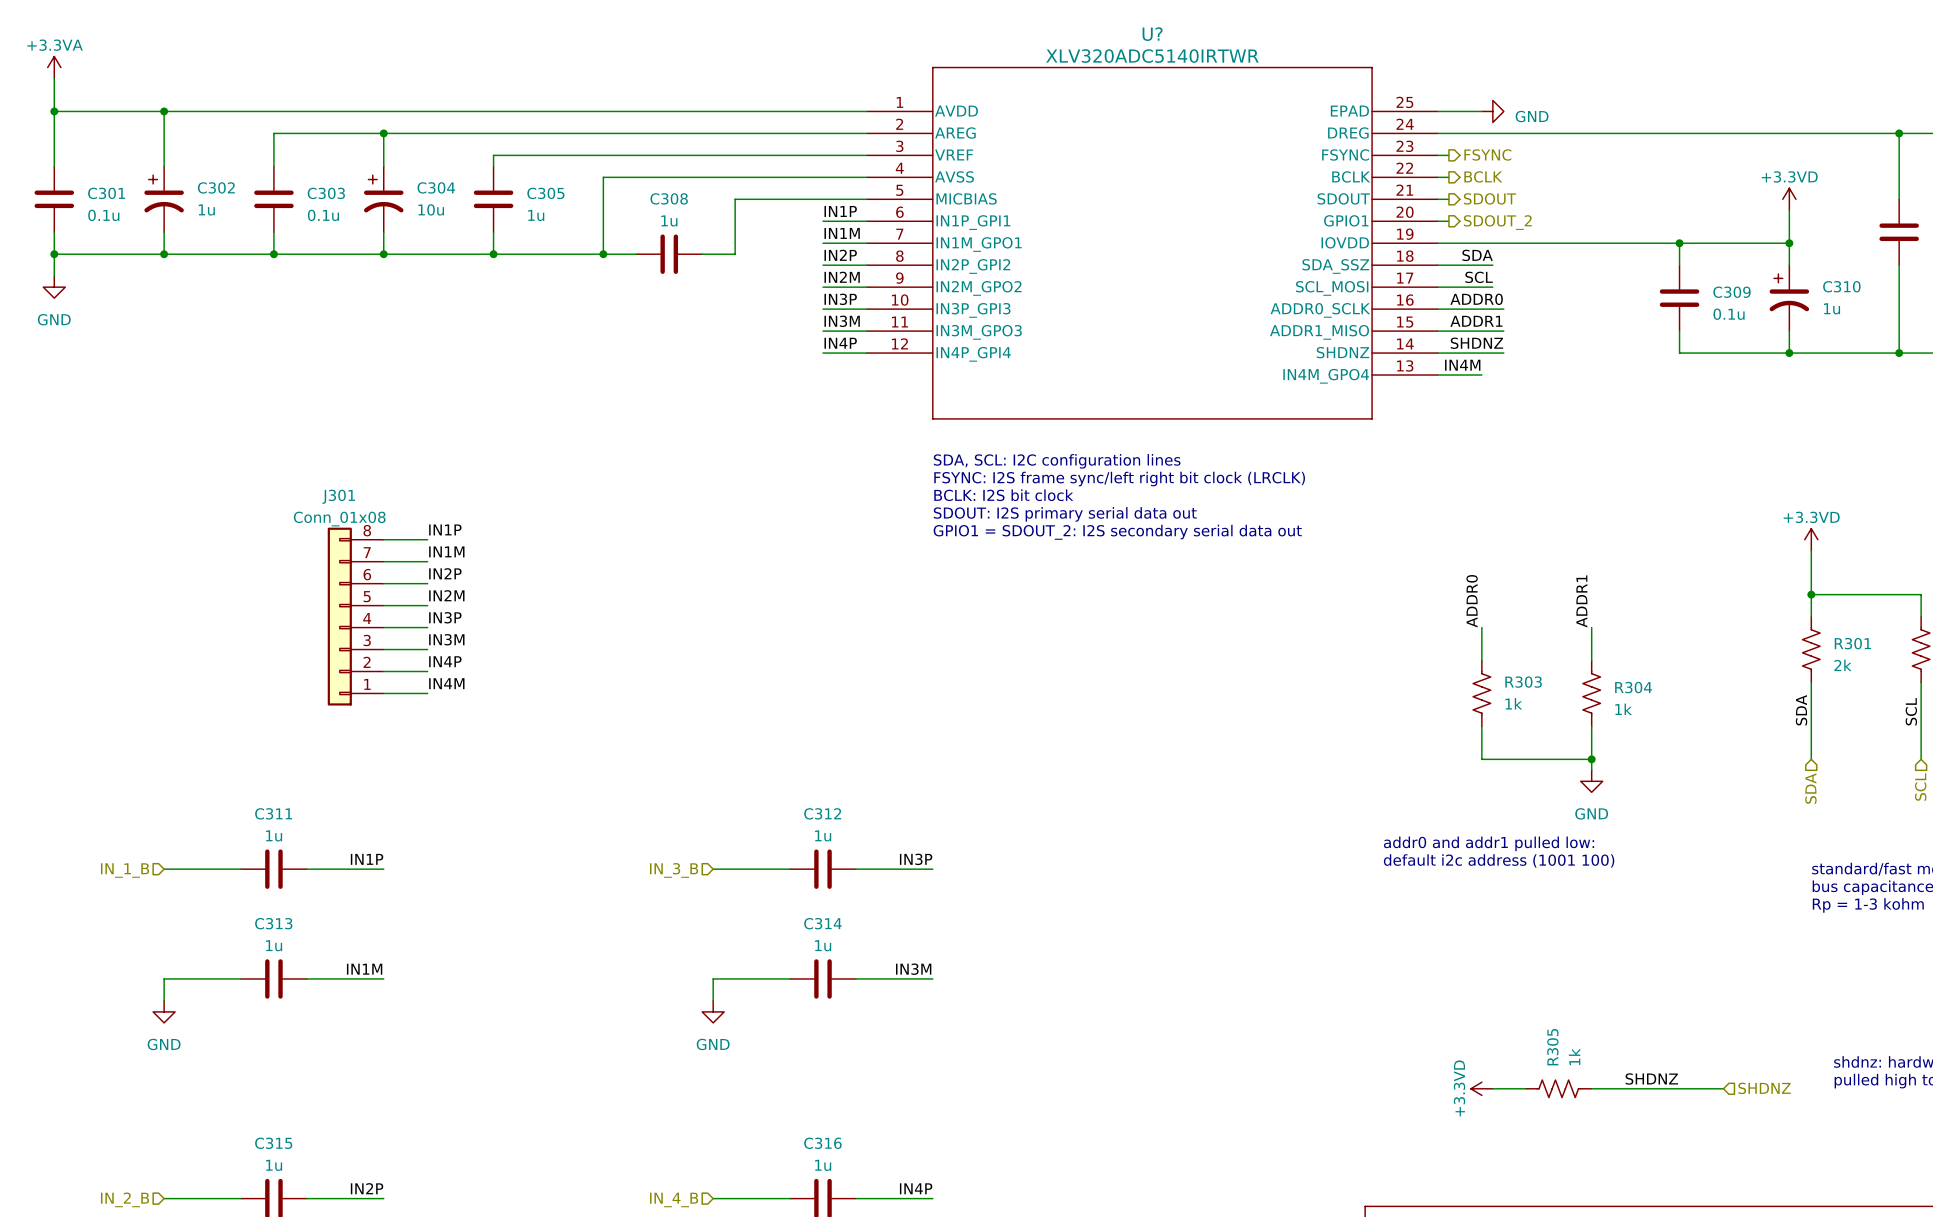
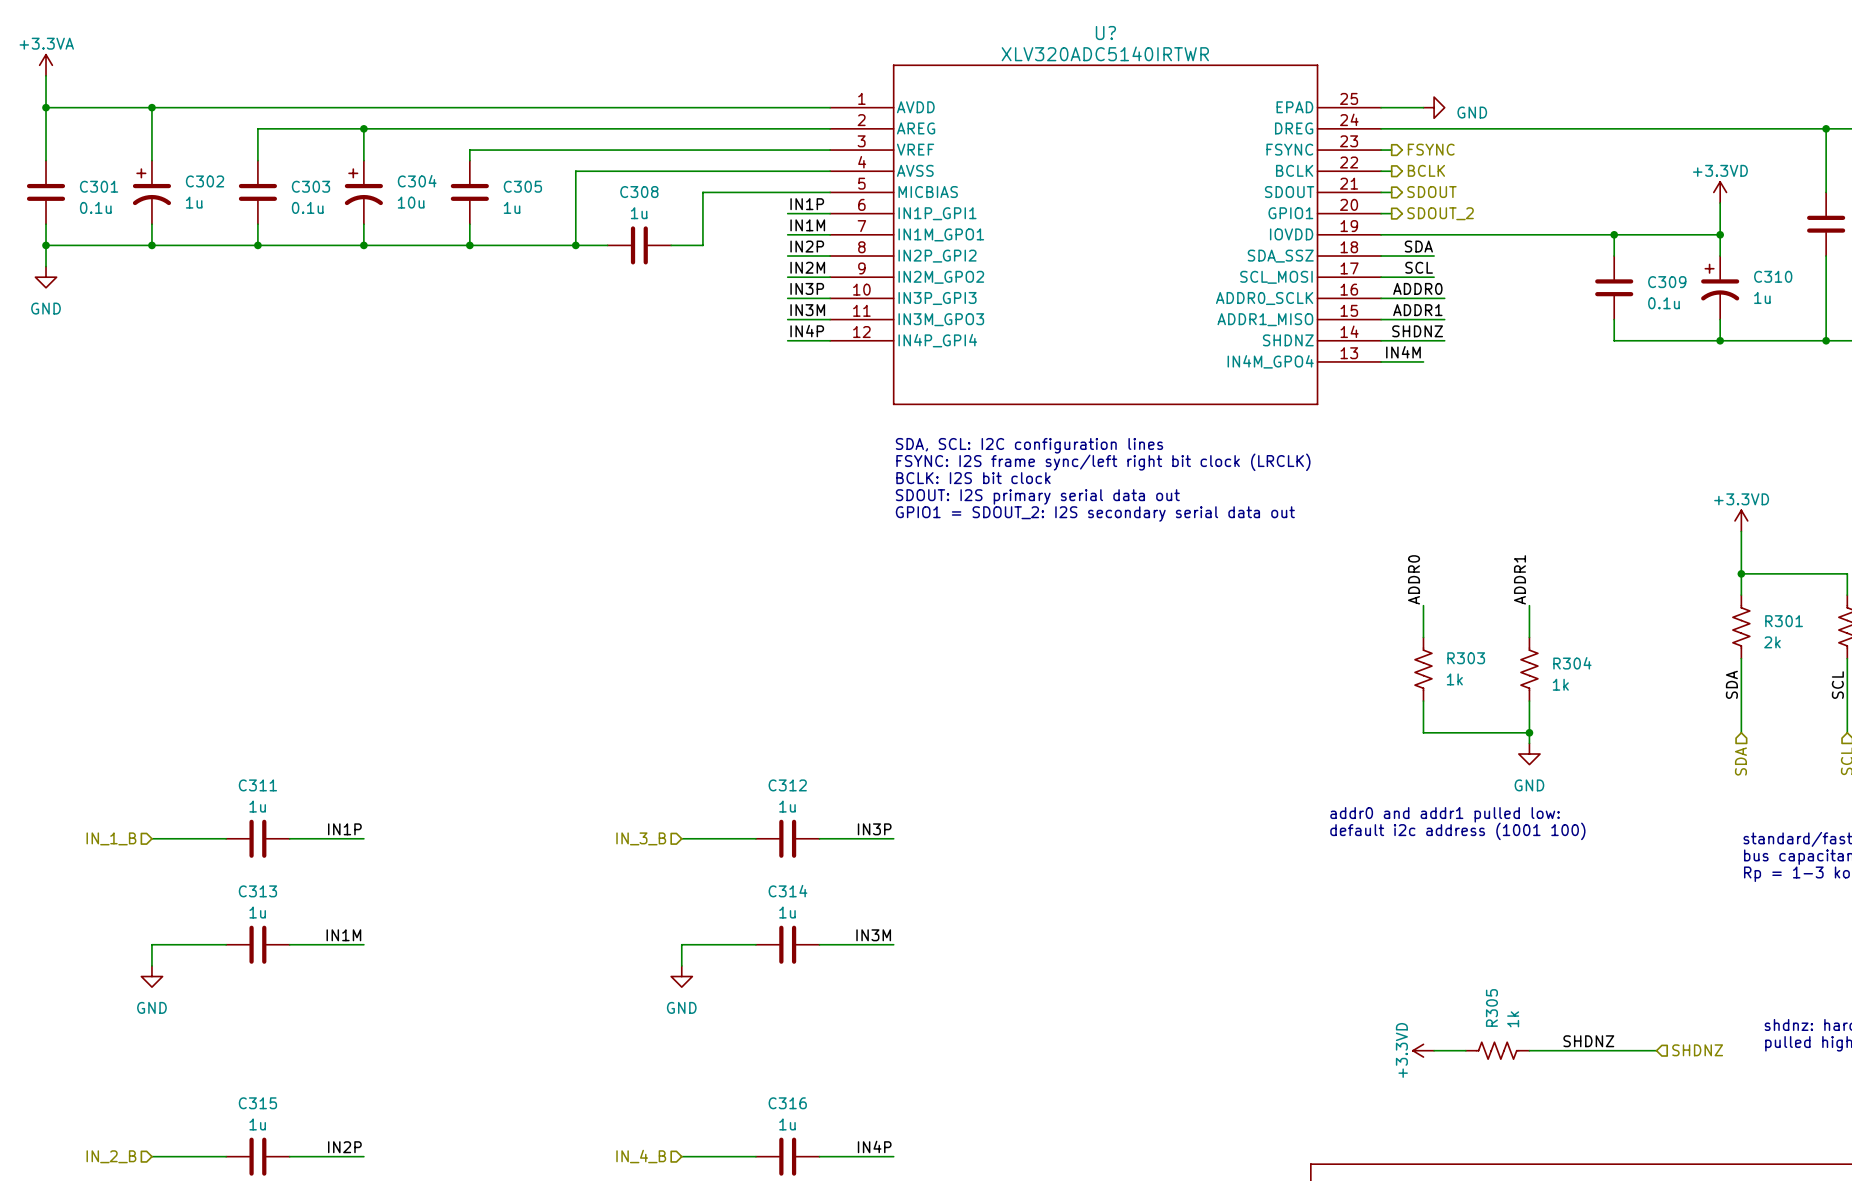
label: IN1P (445, 529) -> none
wire: (383, 539) (427, 539) -> none
label: IN1M (446, 551) -> none
wire: (383, 561) (427, 561) -> none
label: IN2P (445, 573) -> none
wire: (383, 583) (427, 583) -> none
label: IN2M (446, 595) -> none
wire: (383, 605) (427, 605) -> none
J301: Conn_01x08 (355, 616) -> none
label: IN3P (445, 617) -> none
wire: (383, 627) (427, 627) -> none
label: IN3M (446, 639) -> none
wire: (383, 649) (427, 649) -> none
label: IN4P (445, 661) -> none
wire: (383, 671) (427, 671) -> none
label: IN4M (446, 683) -> none
wire: (383, 693) (427, 693) -> none

